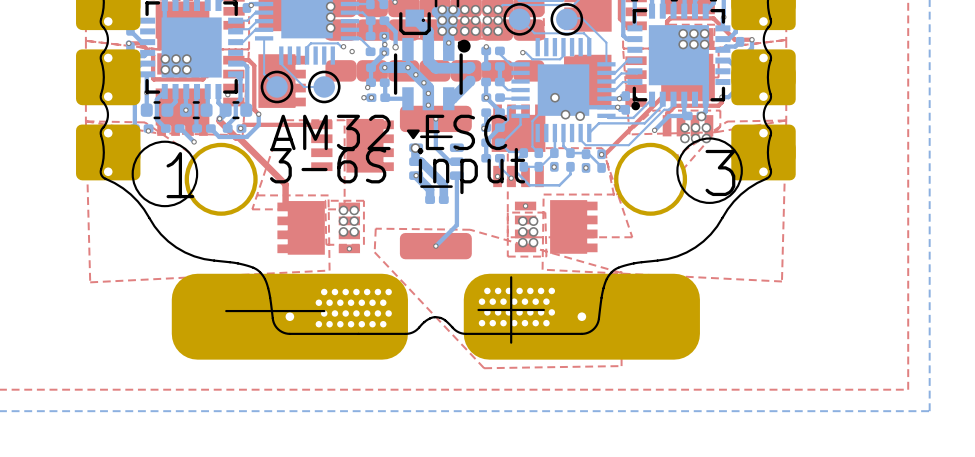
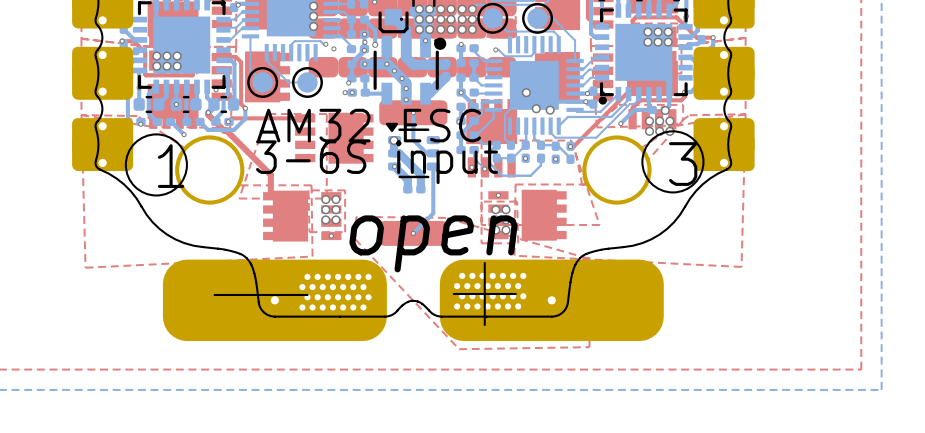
text: none -> open (433, 243)

